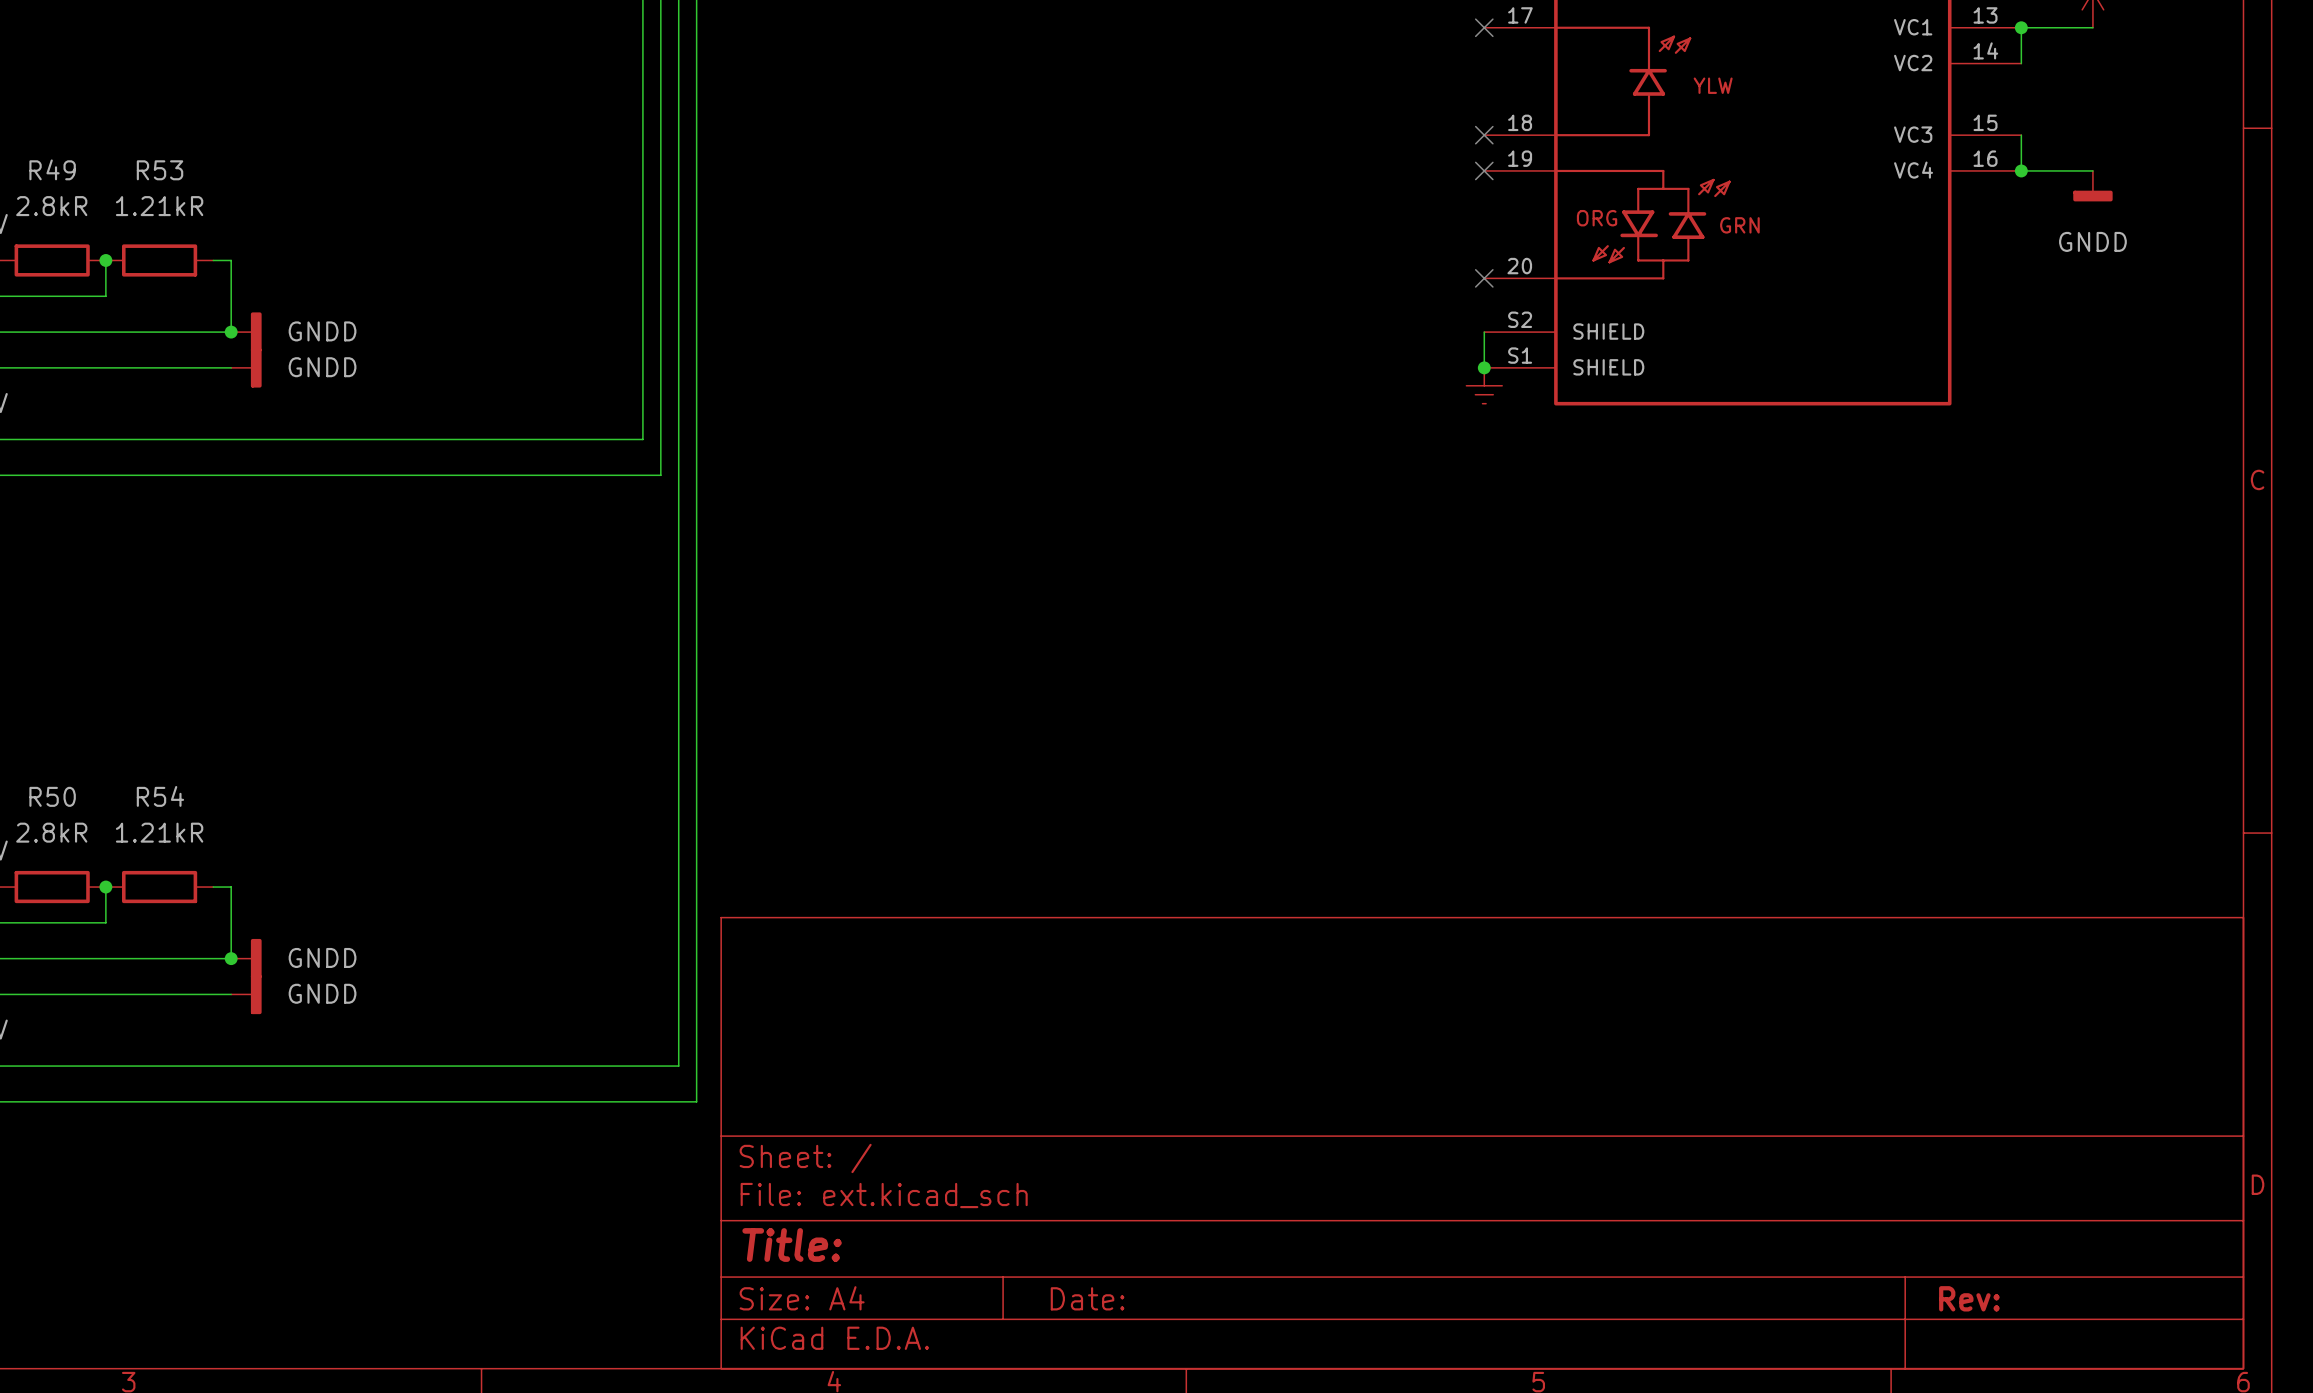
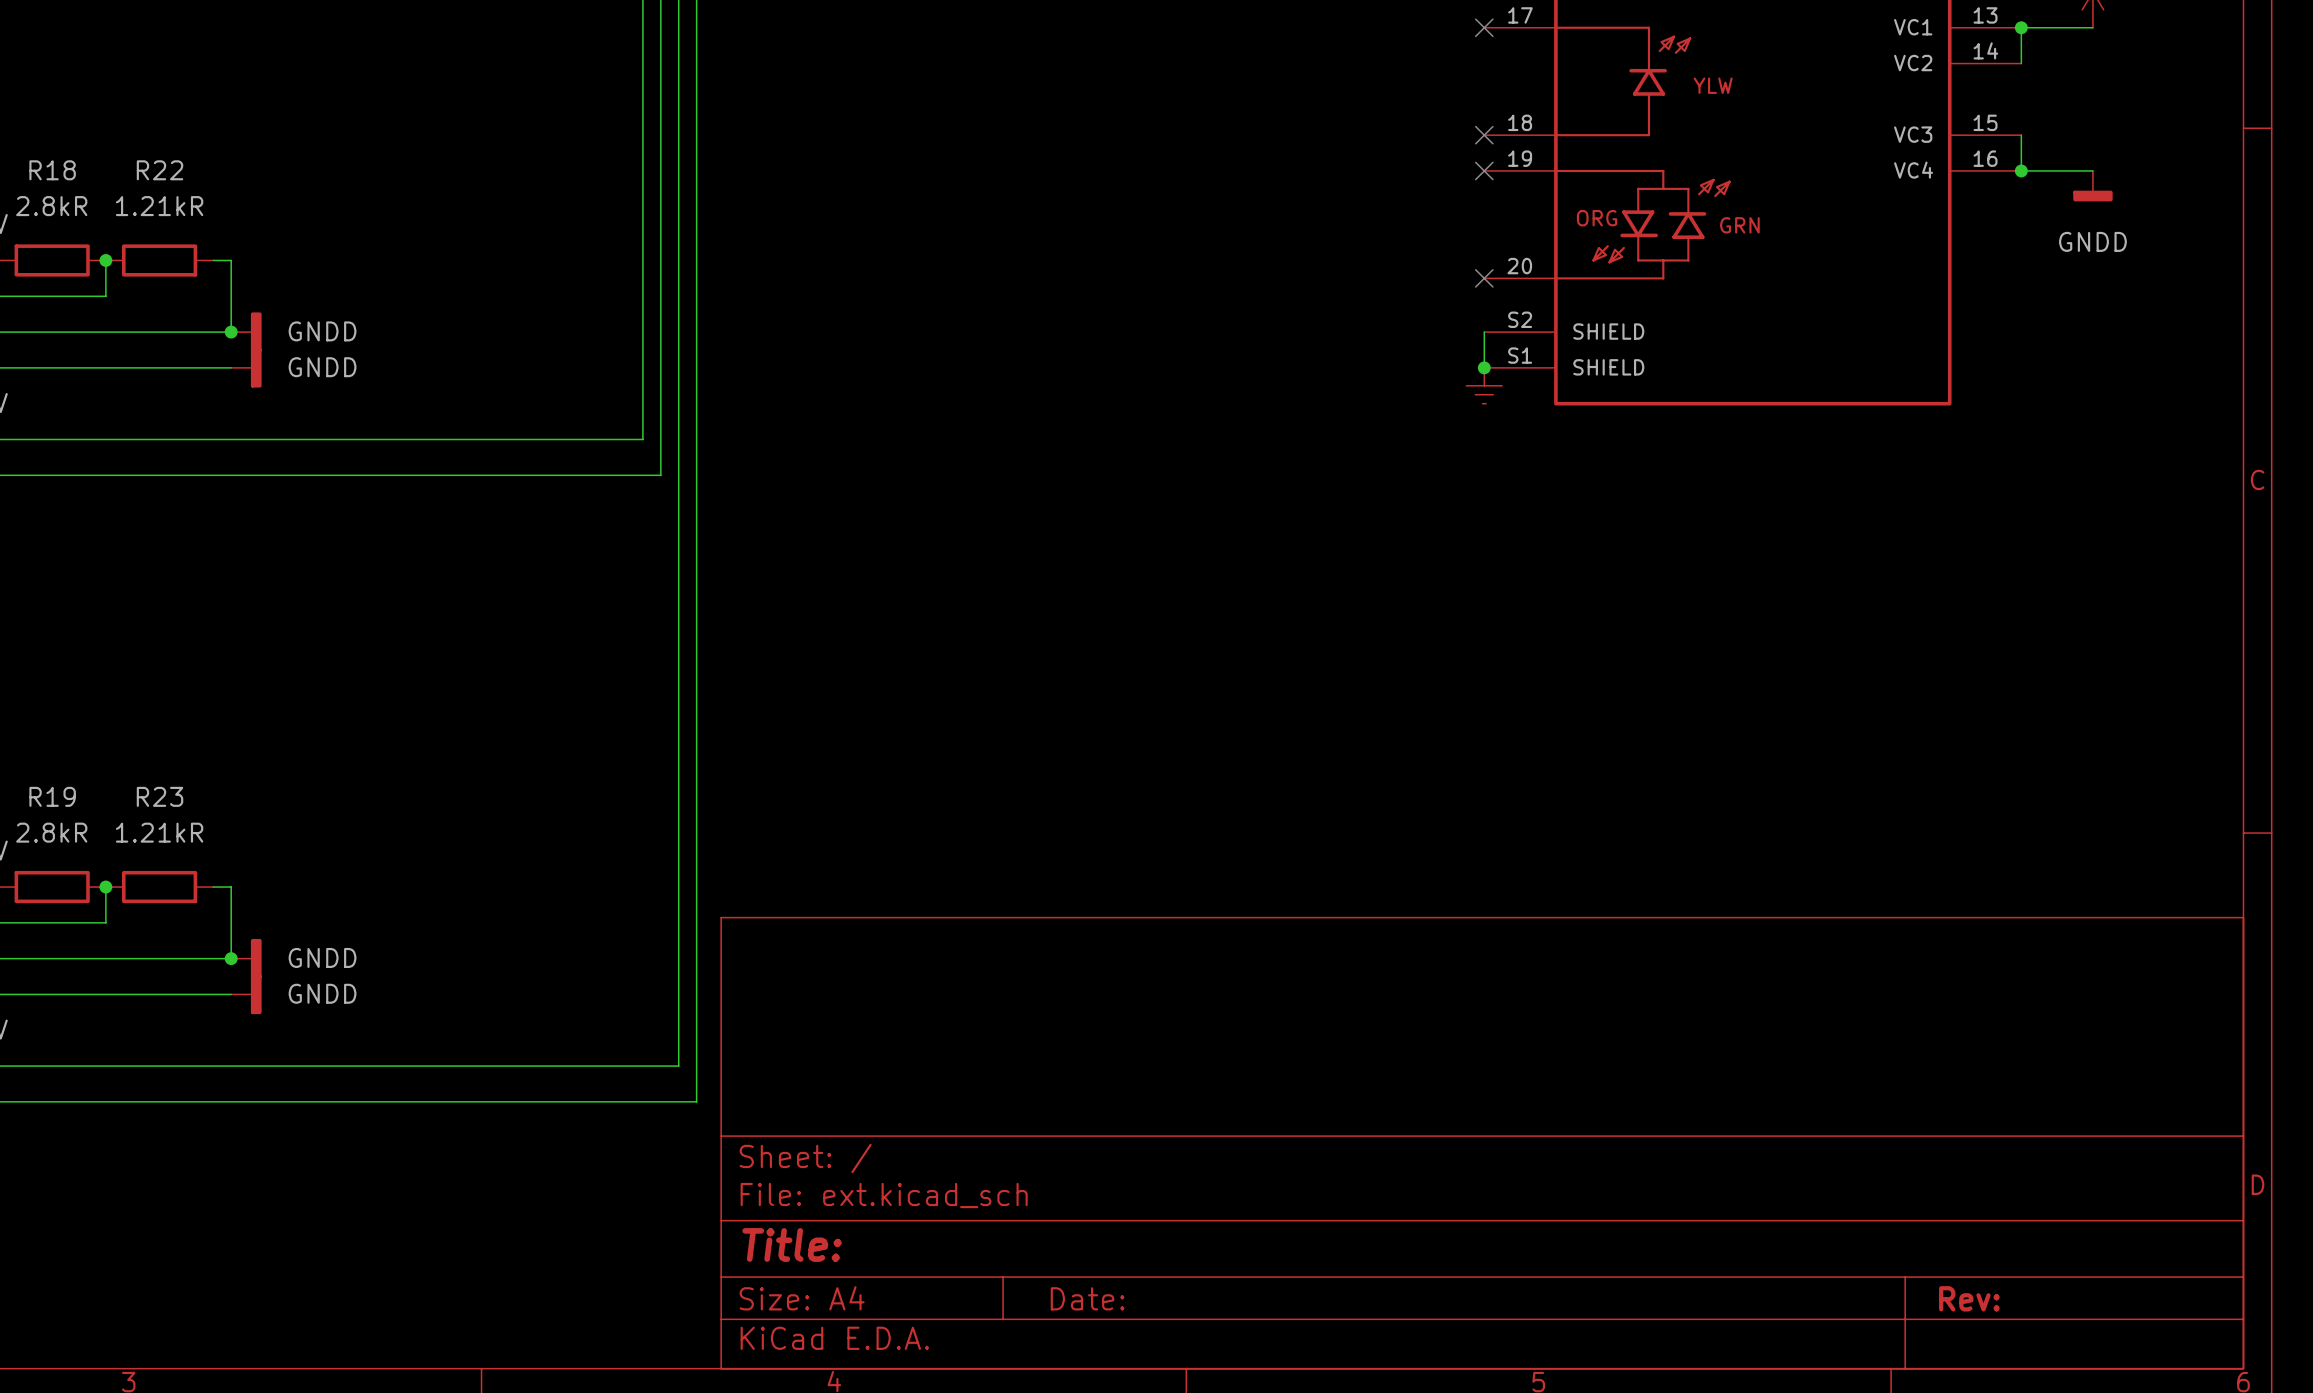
R49 name: R49 (52, 169) -> R18 (52, 170)
R53 name: R53 (160, 170) -> R22 (160, 170)
R50 name: R50 (52, 796) -> R19 (52, 796)
R54 name: R54 (160, 796) -> R23 (160, 796)

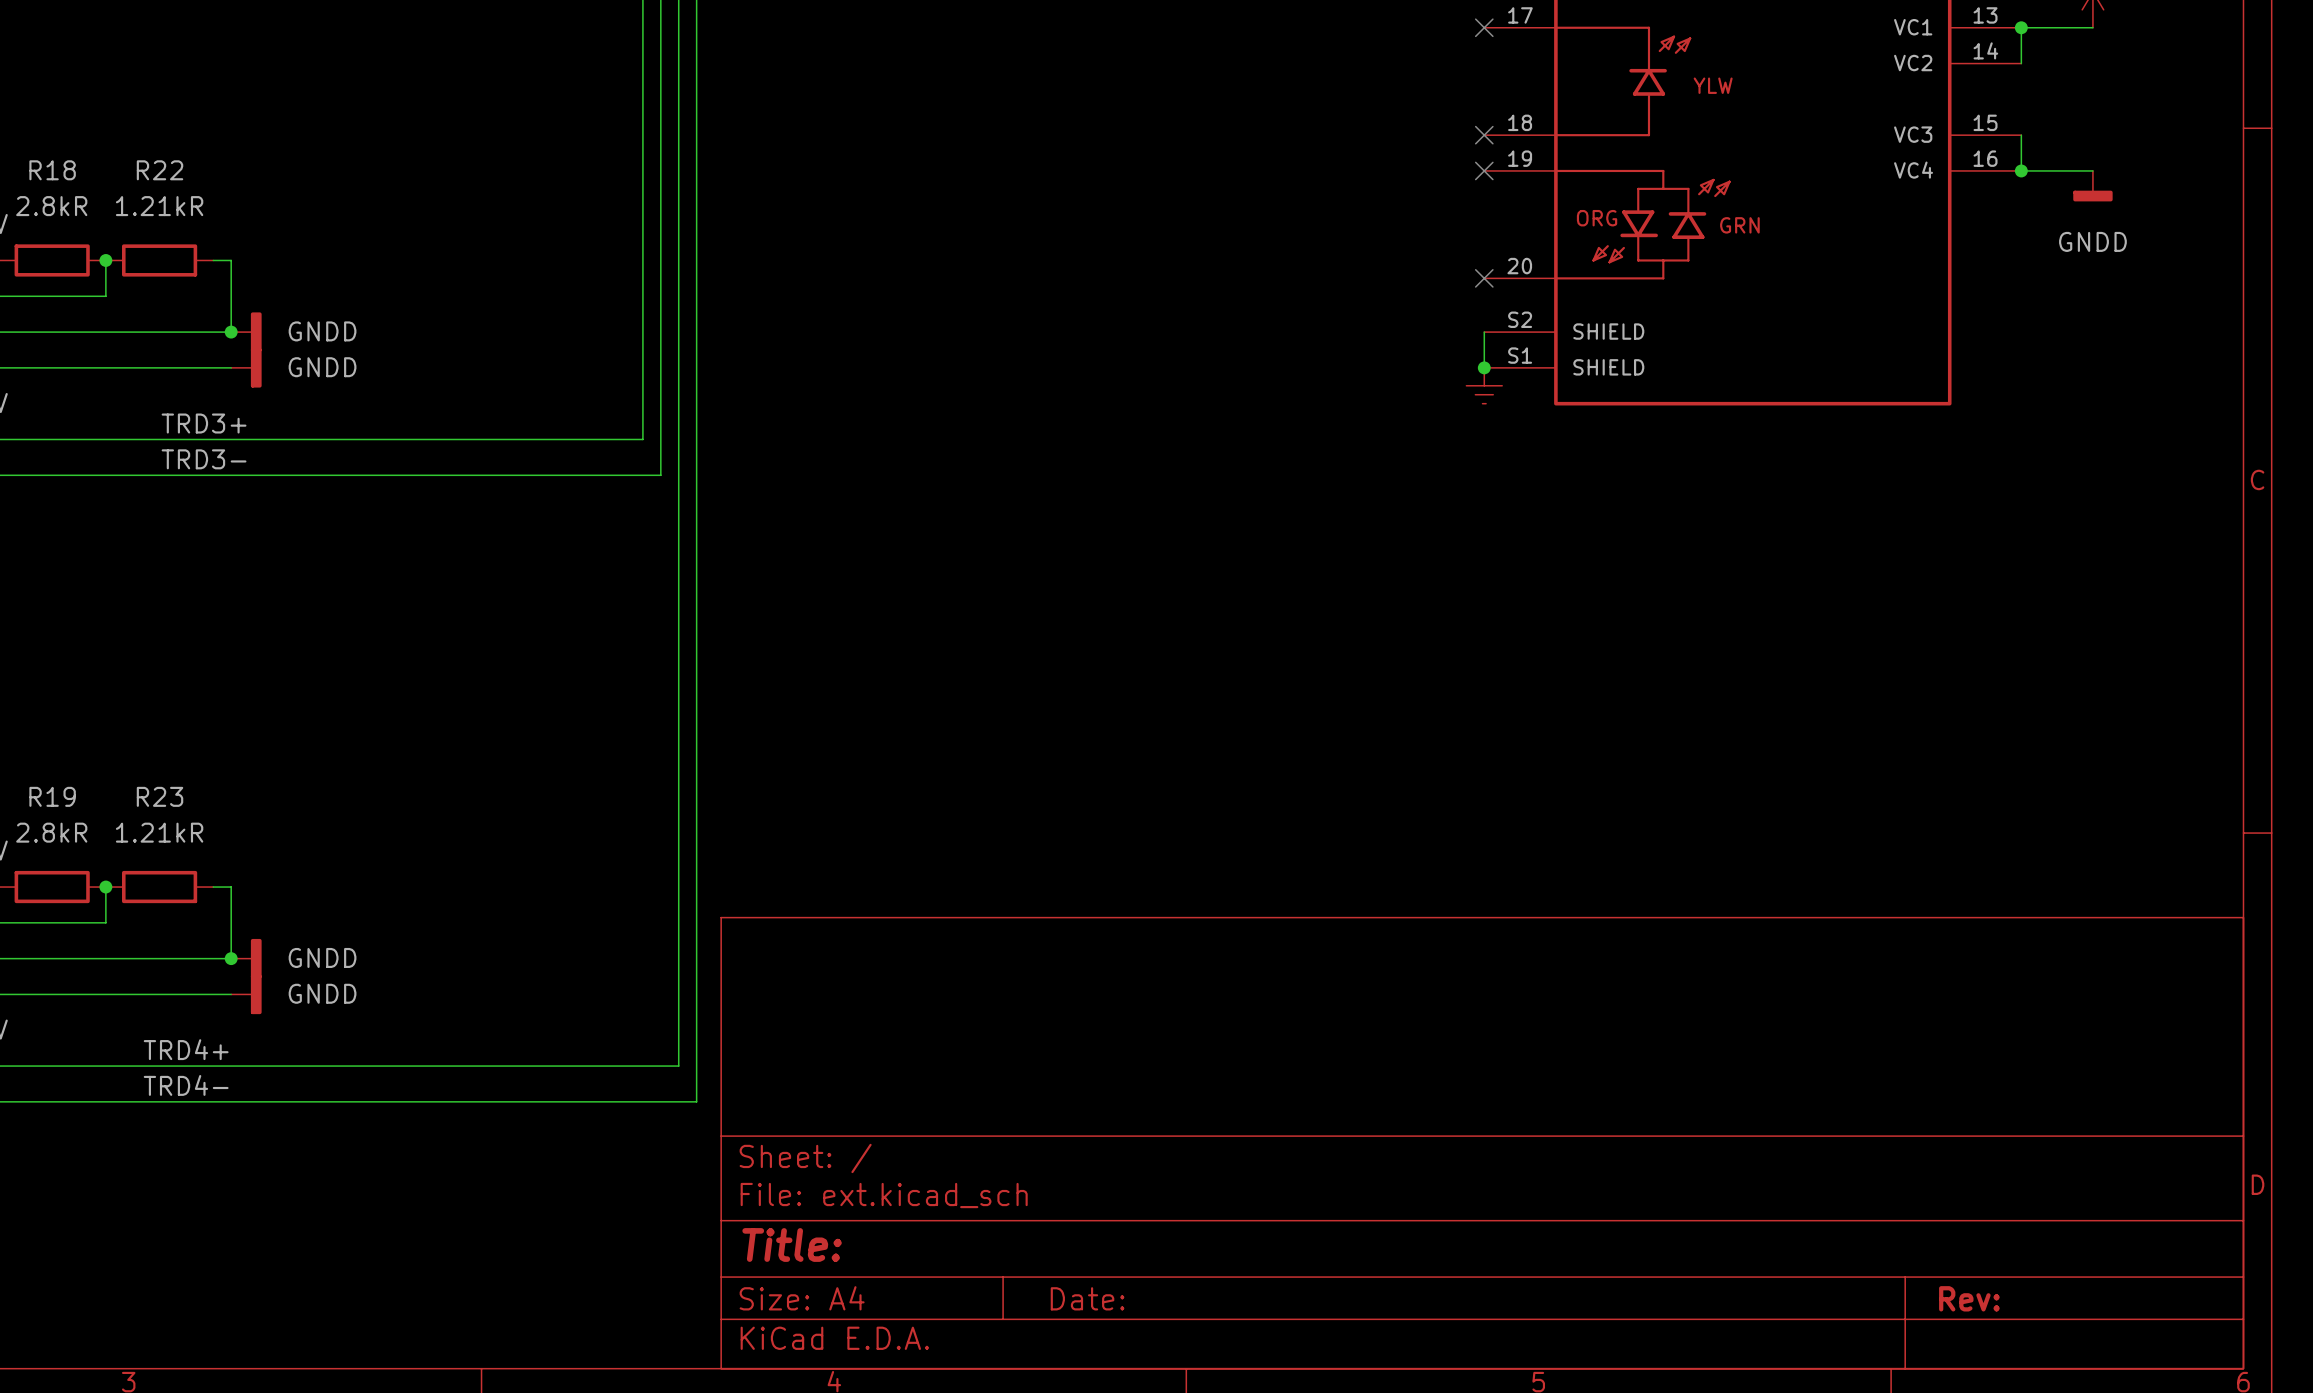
label: none -> TRD3+ (204, 423)
label: none -> TRD3- (204, 459)
label: none -> TRD4+ (186, 1049)
label: none -> TRD4- (186, 1085)

